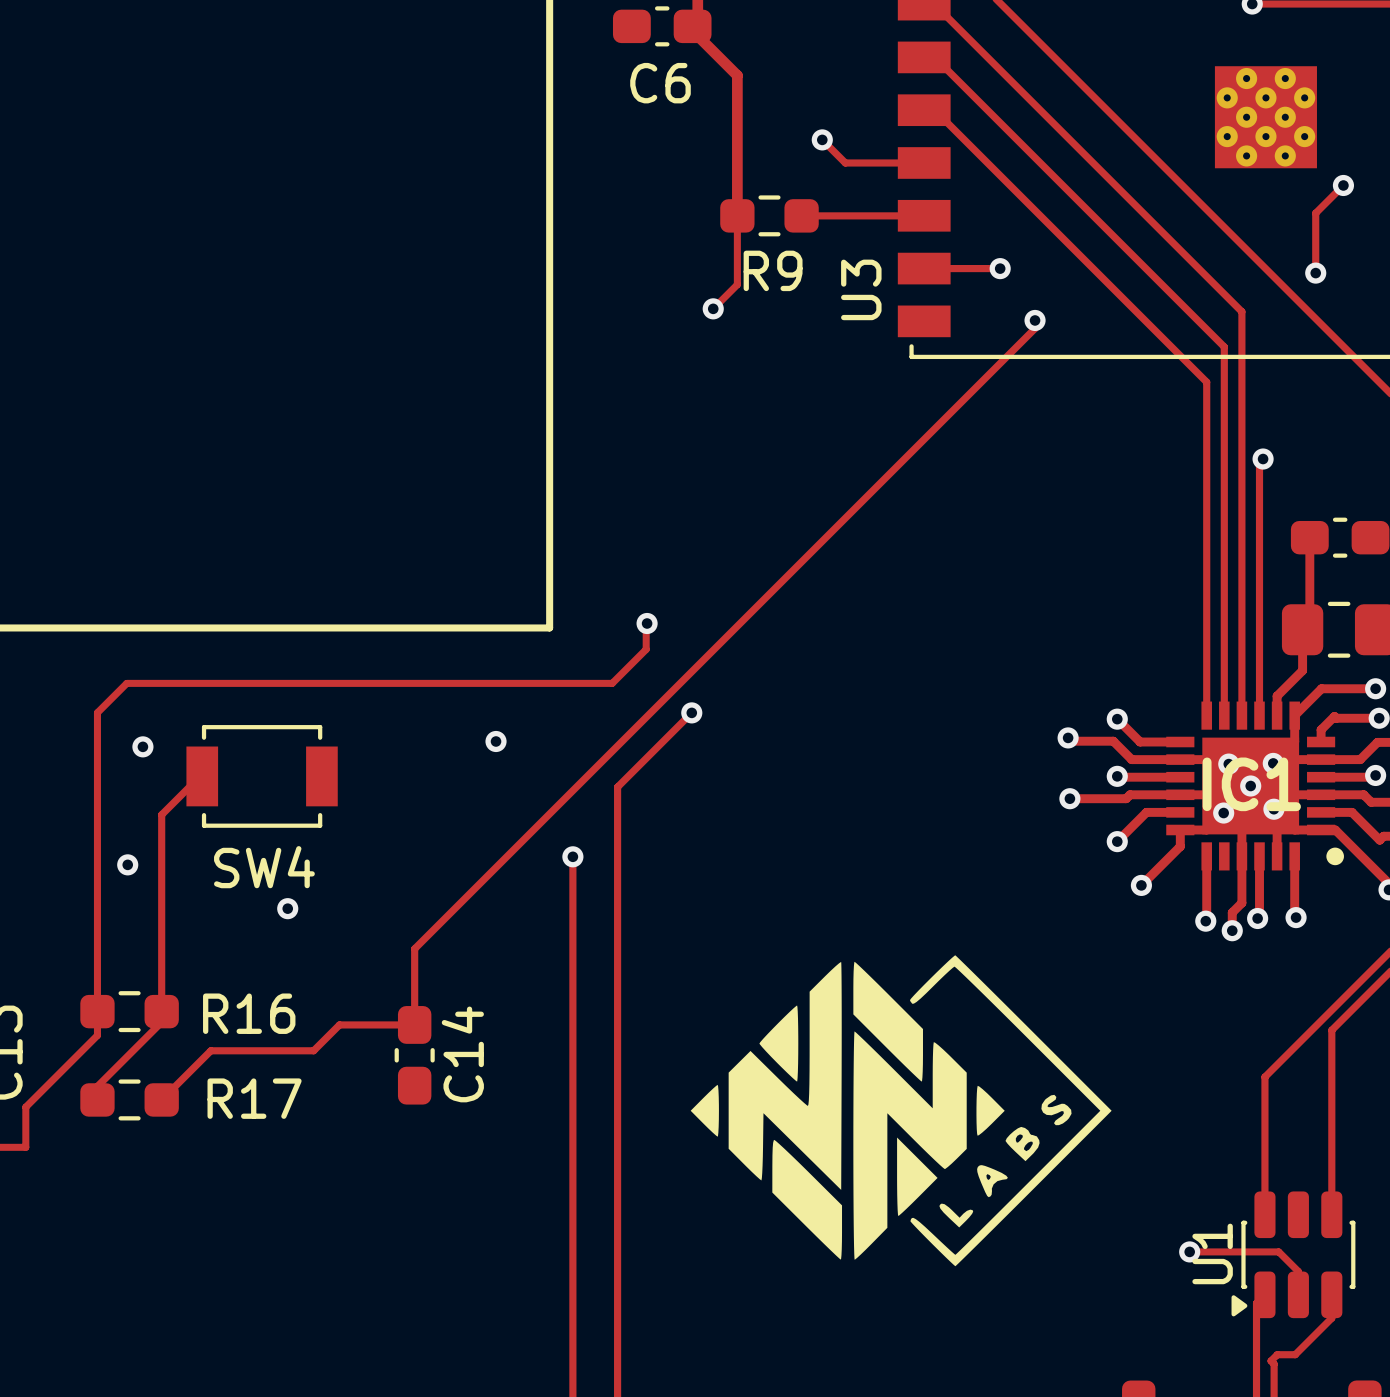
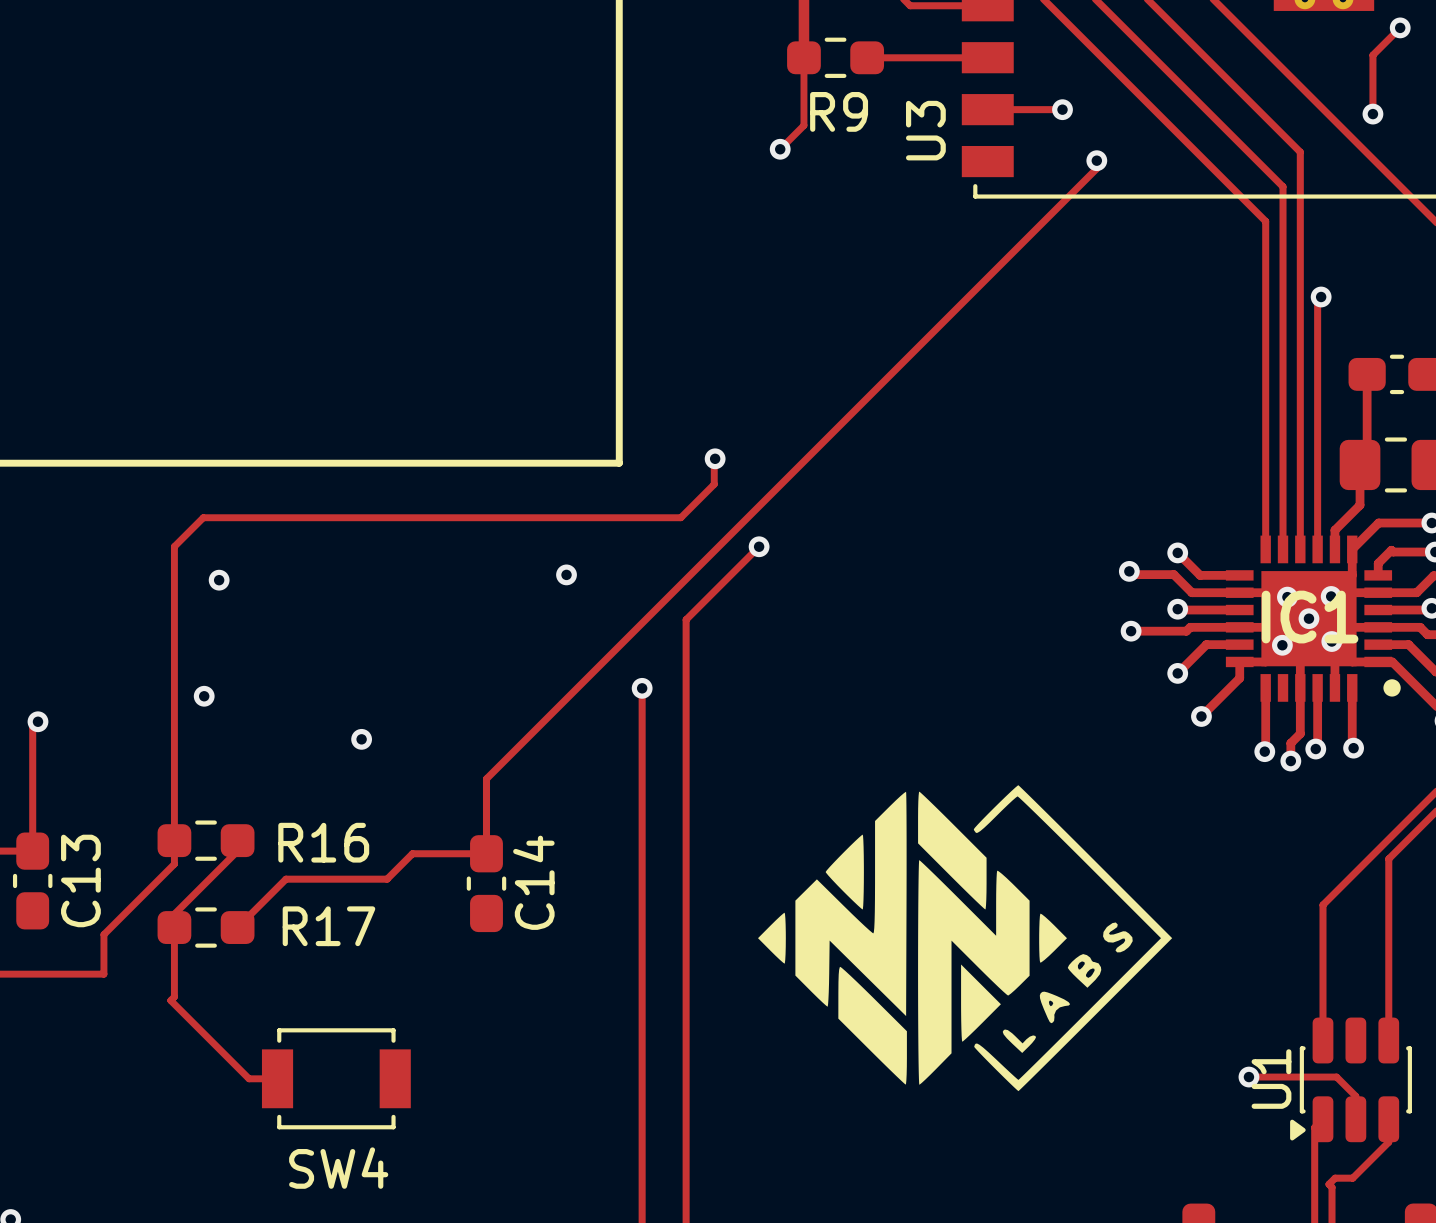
track: (202, 776) (200, 776) (161, 814) (161, 1011) -> none
SW4 position: (262, 776) -> (336, 1078)
track: none -> (174, 927) (174, 996) (170, 1000) (249, 1078) (277, 1078)

